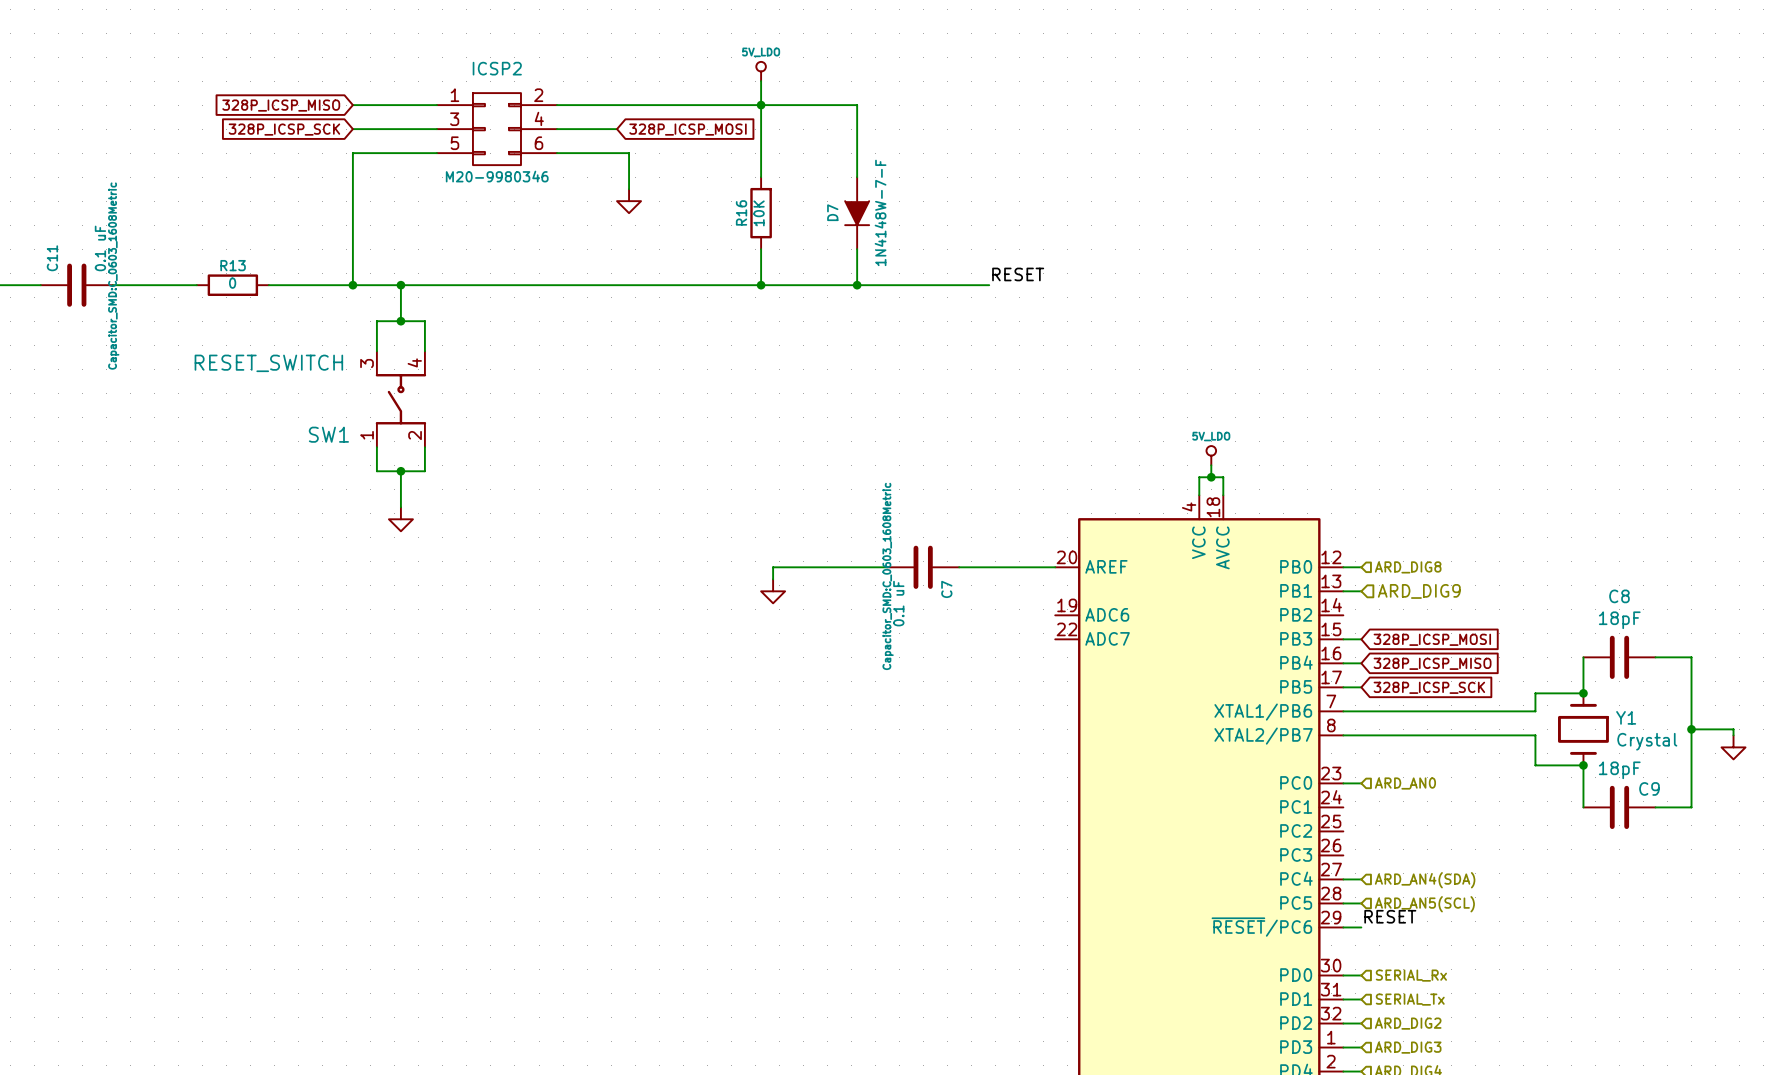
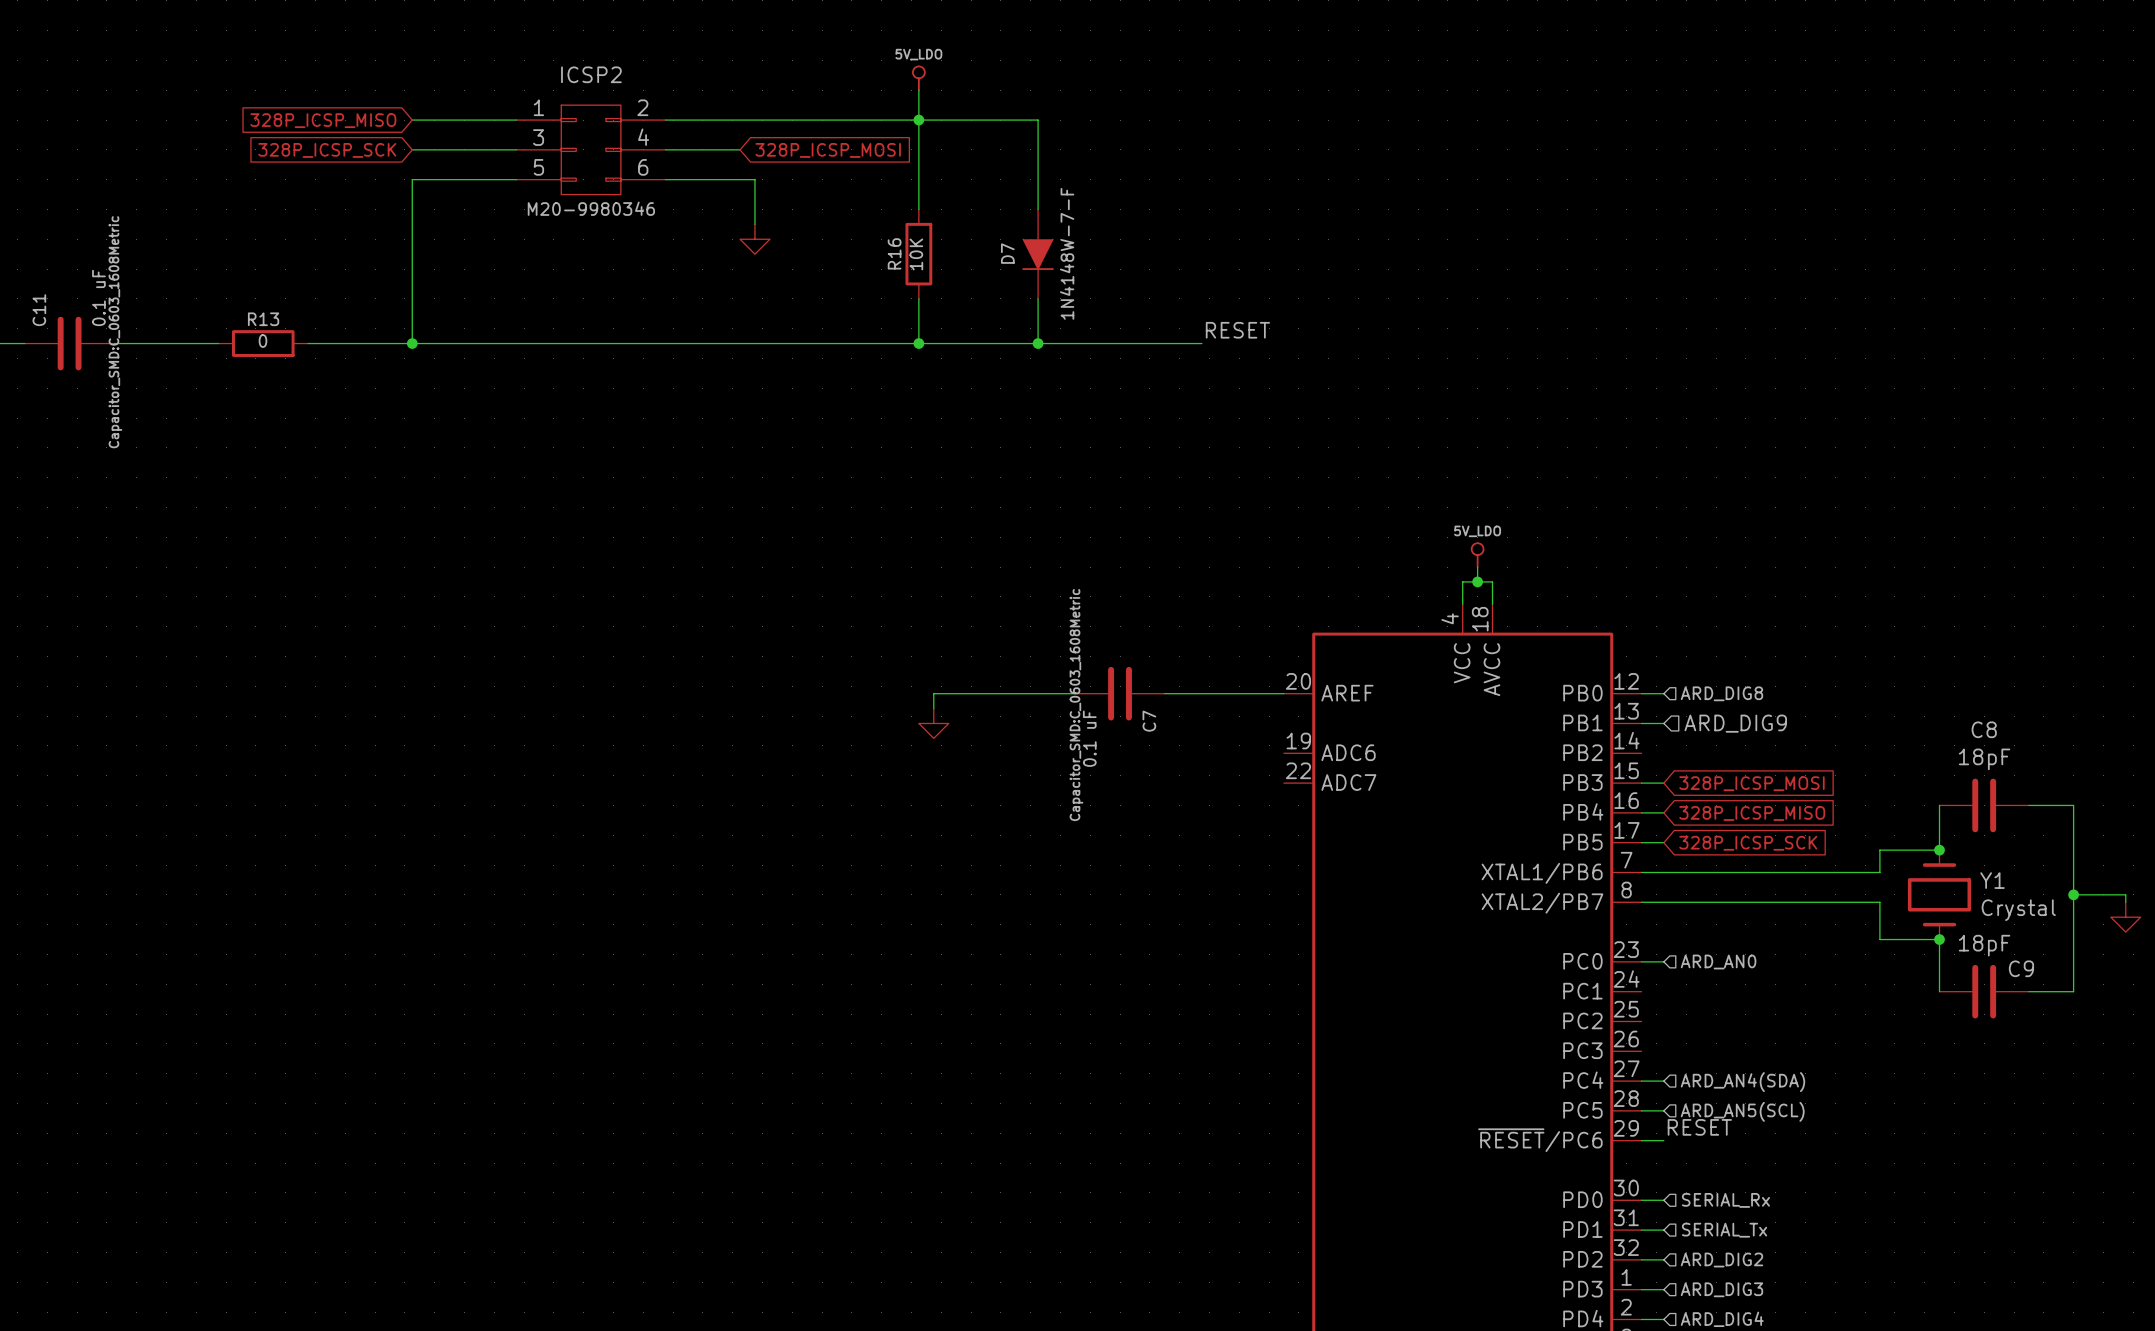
wire: (400, 285) (400, 321) -> none
junction: (400, 285) -> none
junction: (400, 321) -> none
wire: (376, 351) (376, 321) (424, 321) (424, 351) -> none
SW1: RESET_SWITCH (400, 399) -> none
wire: (376, 447) (376, 471) (424, 471) (424, 447) -> none
wire: (400, 471) (400, 507) -> none
junction: (400, 471) -> none
power symbol: (400, 519) -> none

